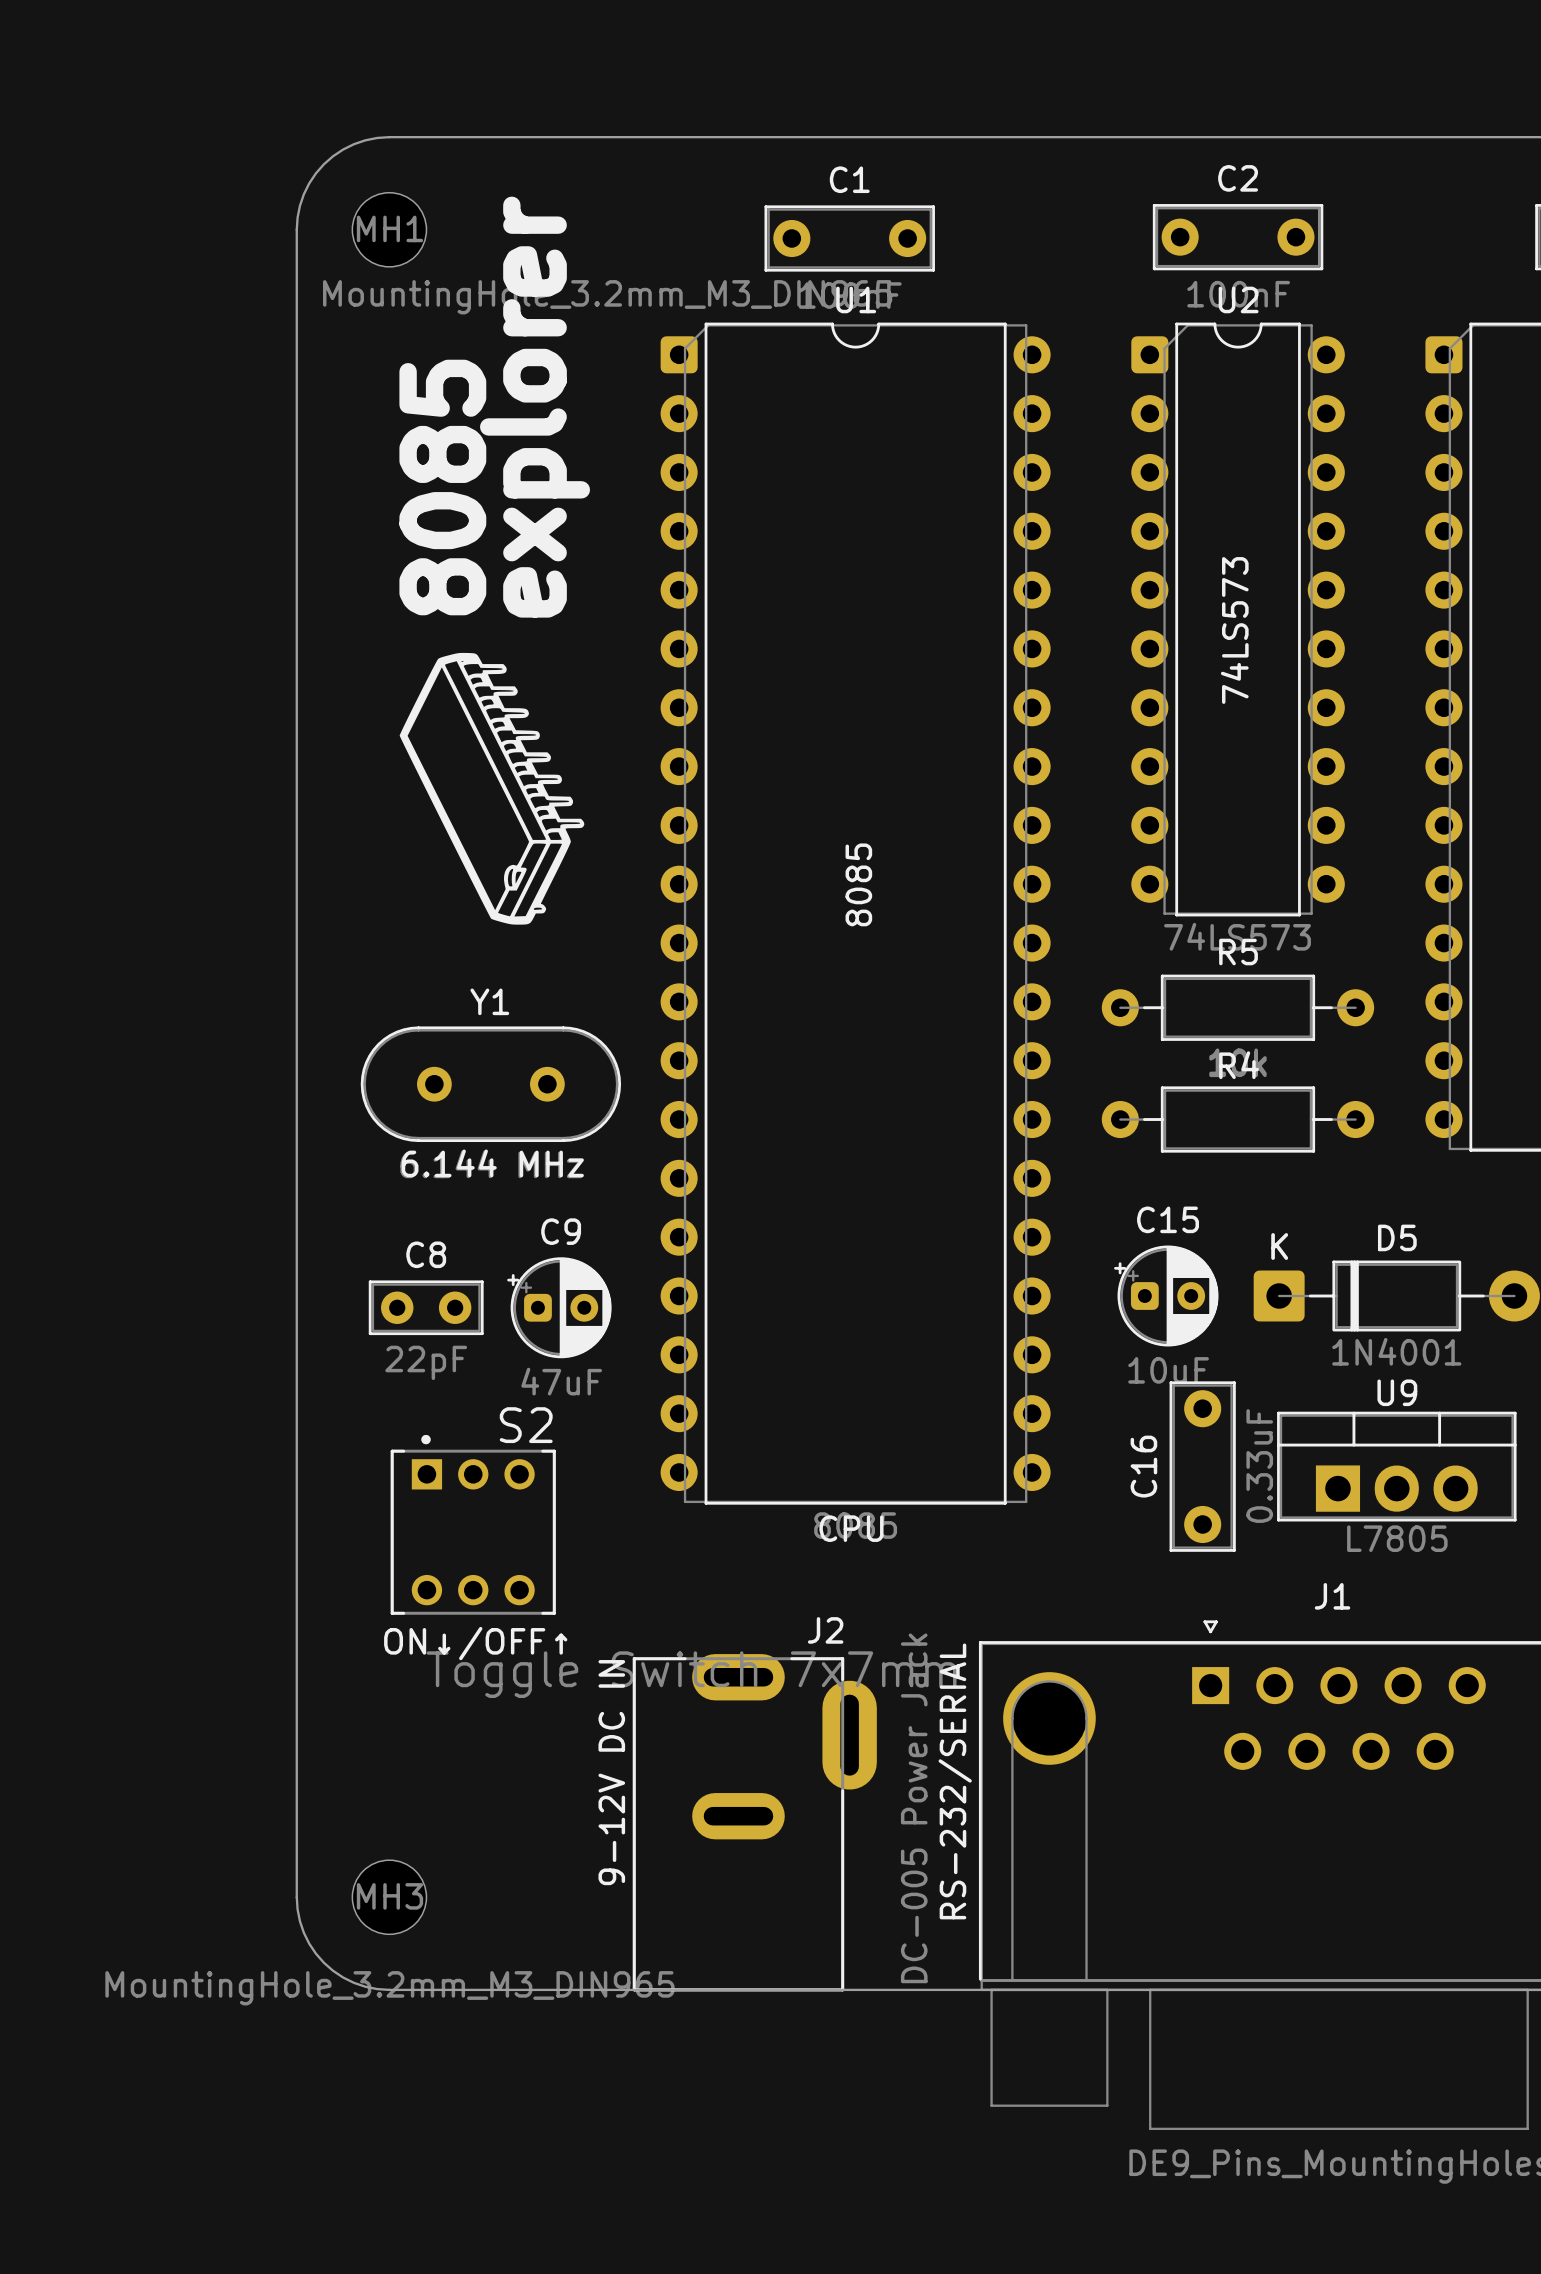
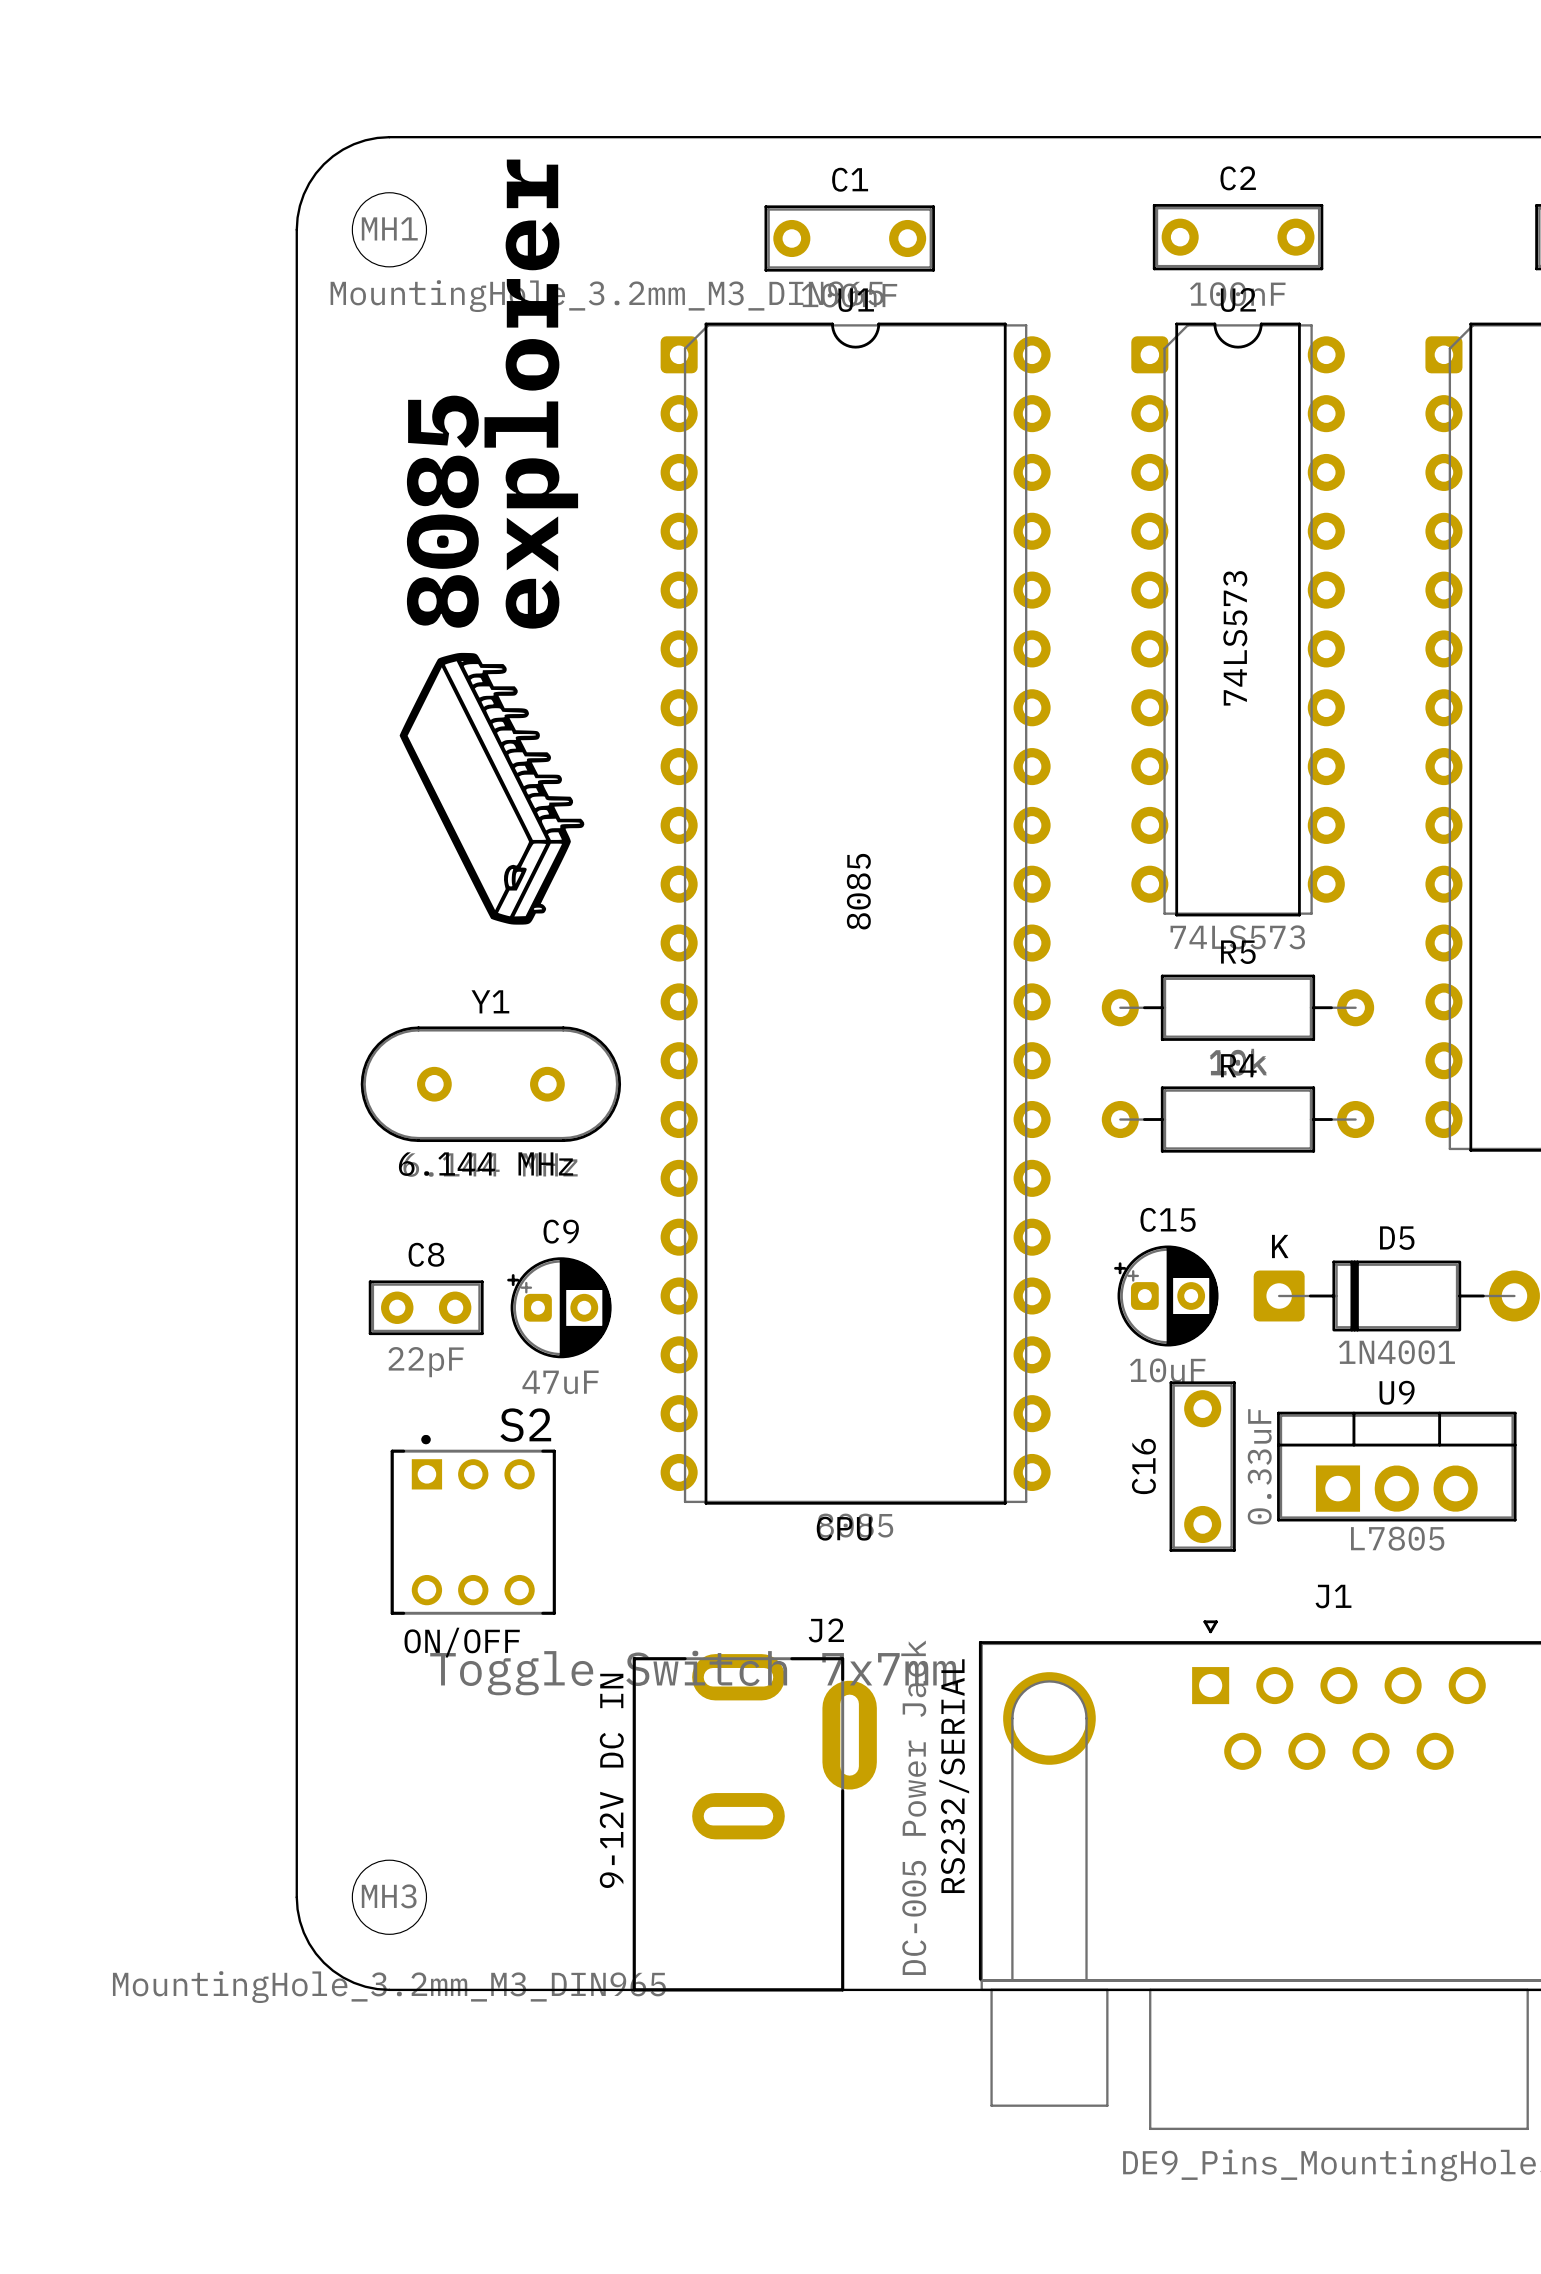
text: ON↓/OFF↑ (475, 1643) -> ON/OFF (462, 1642)
text: RS-232/SERIAL (955, 1781) -> RS232/SERIAL (954, 1776)

